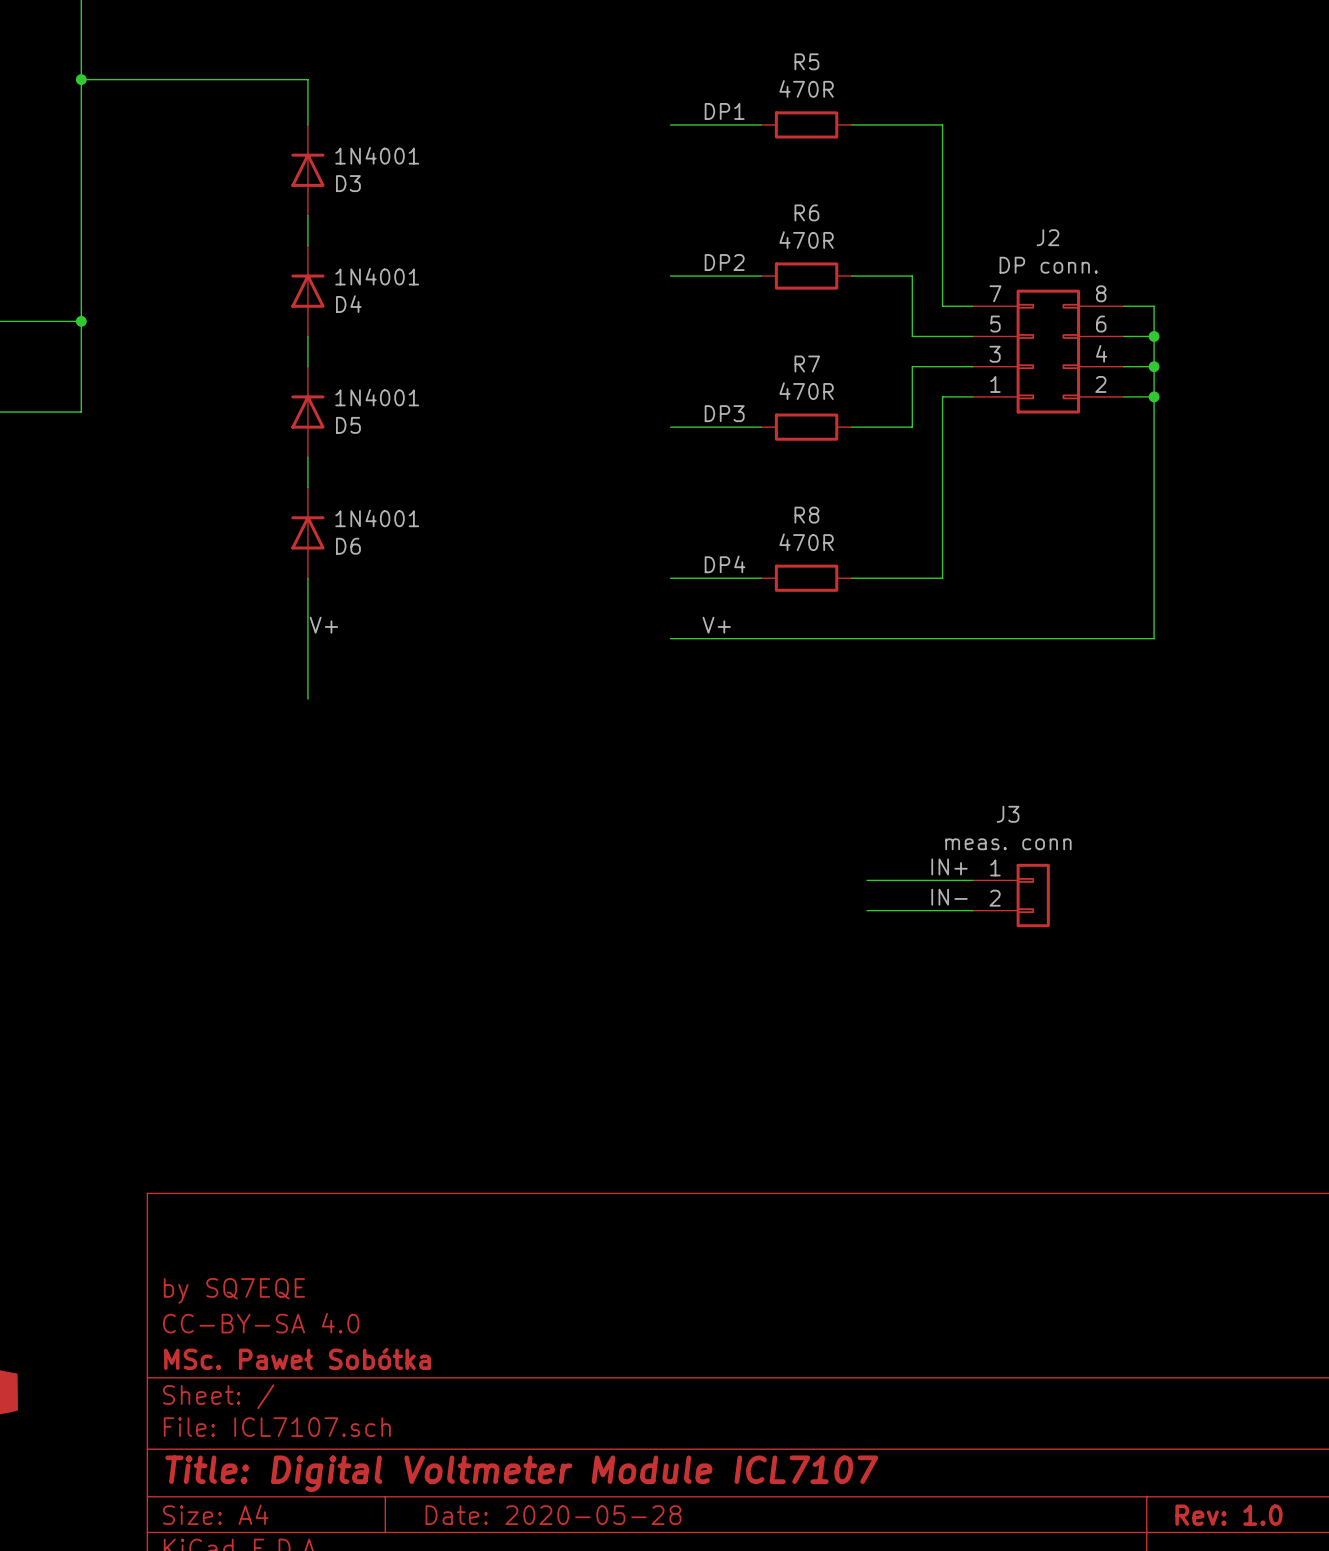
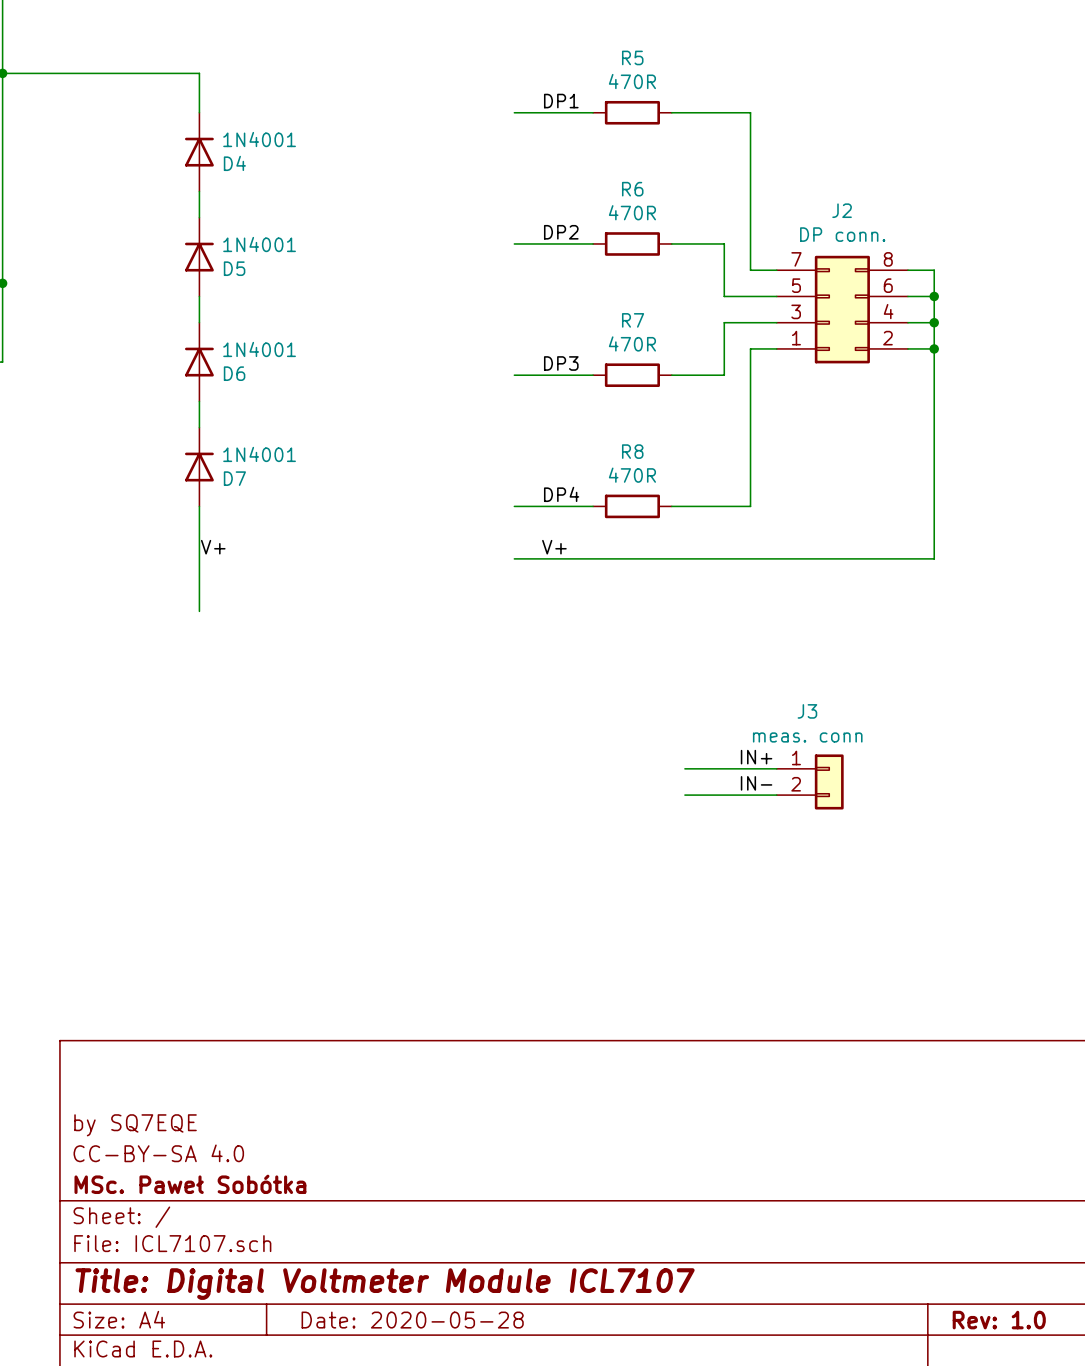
D3 name: D3 (348, 183) -> D4 (234, 163)
D4 name: D4 (348, 304) -> D5 (234, 268)
D5 name: D5 (348, 425) -> D6 (234, 373)
D6 name: D6 (348, 546) -> D7 (234, 478)

